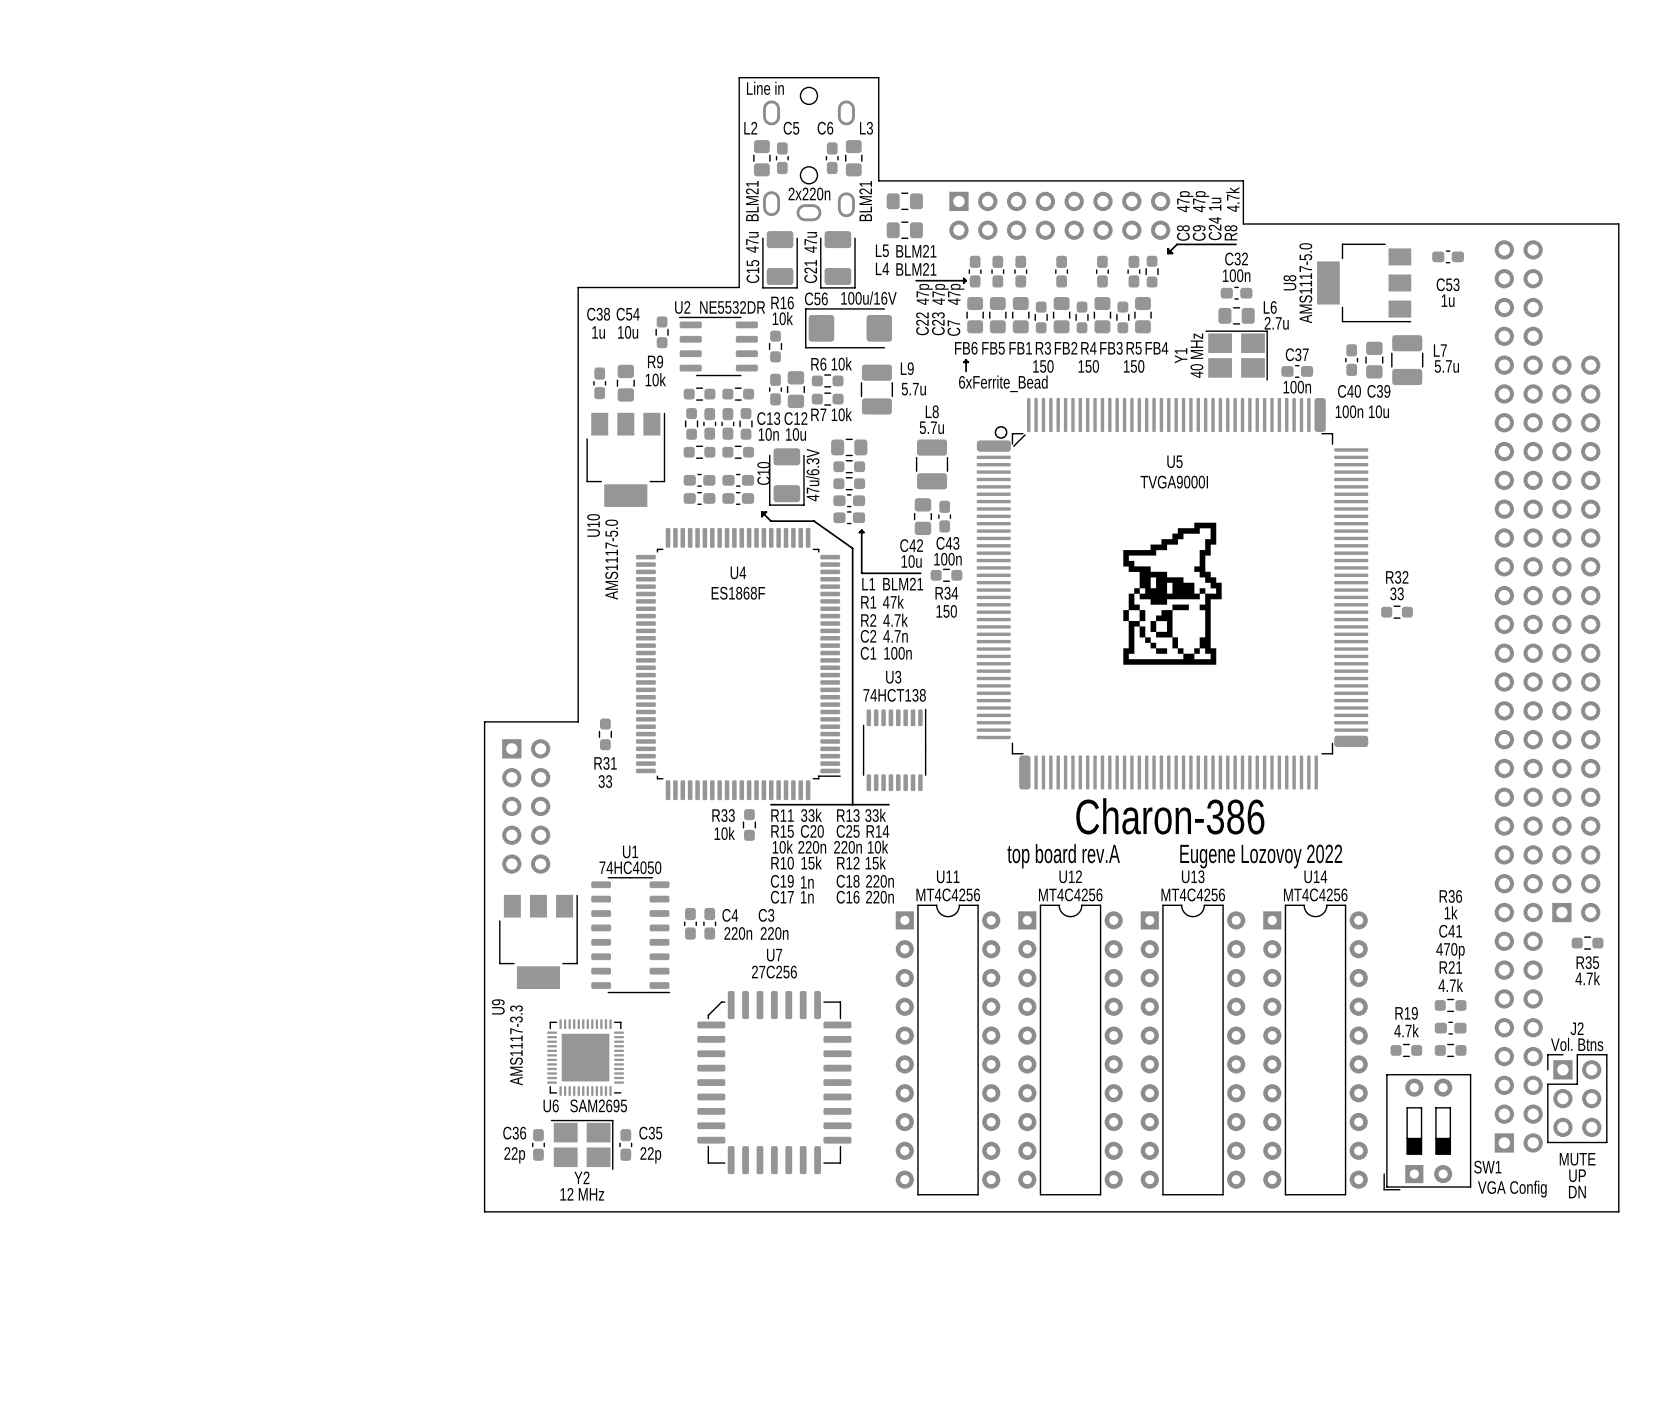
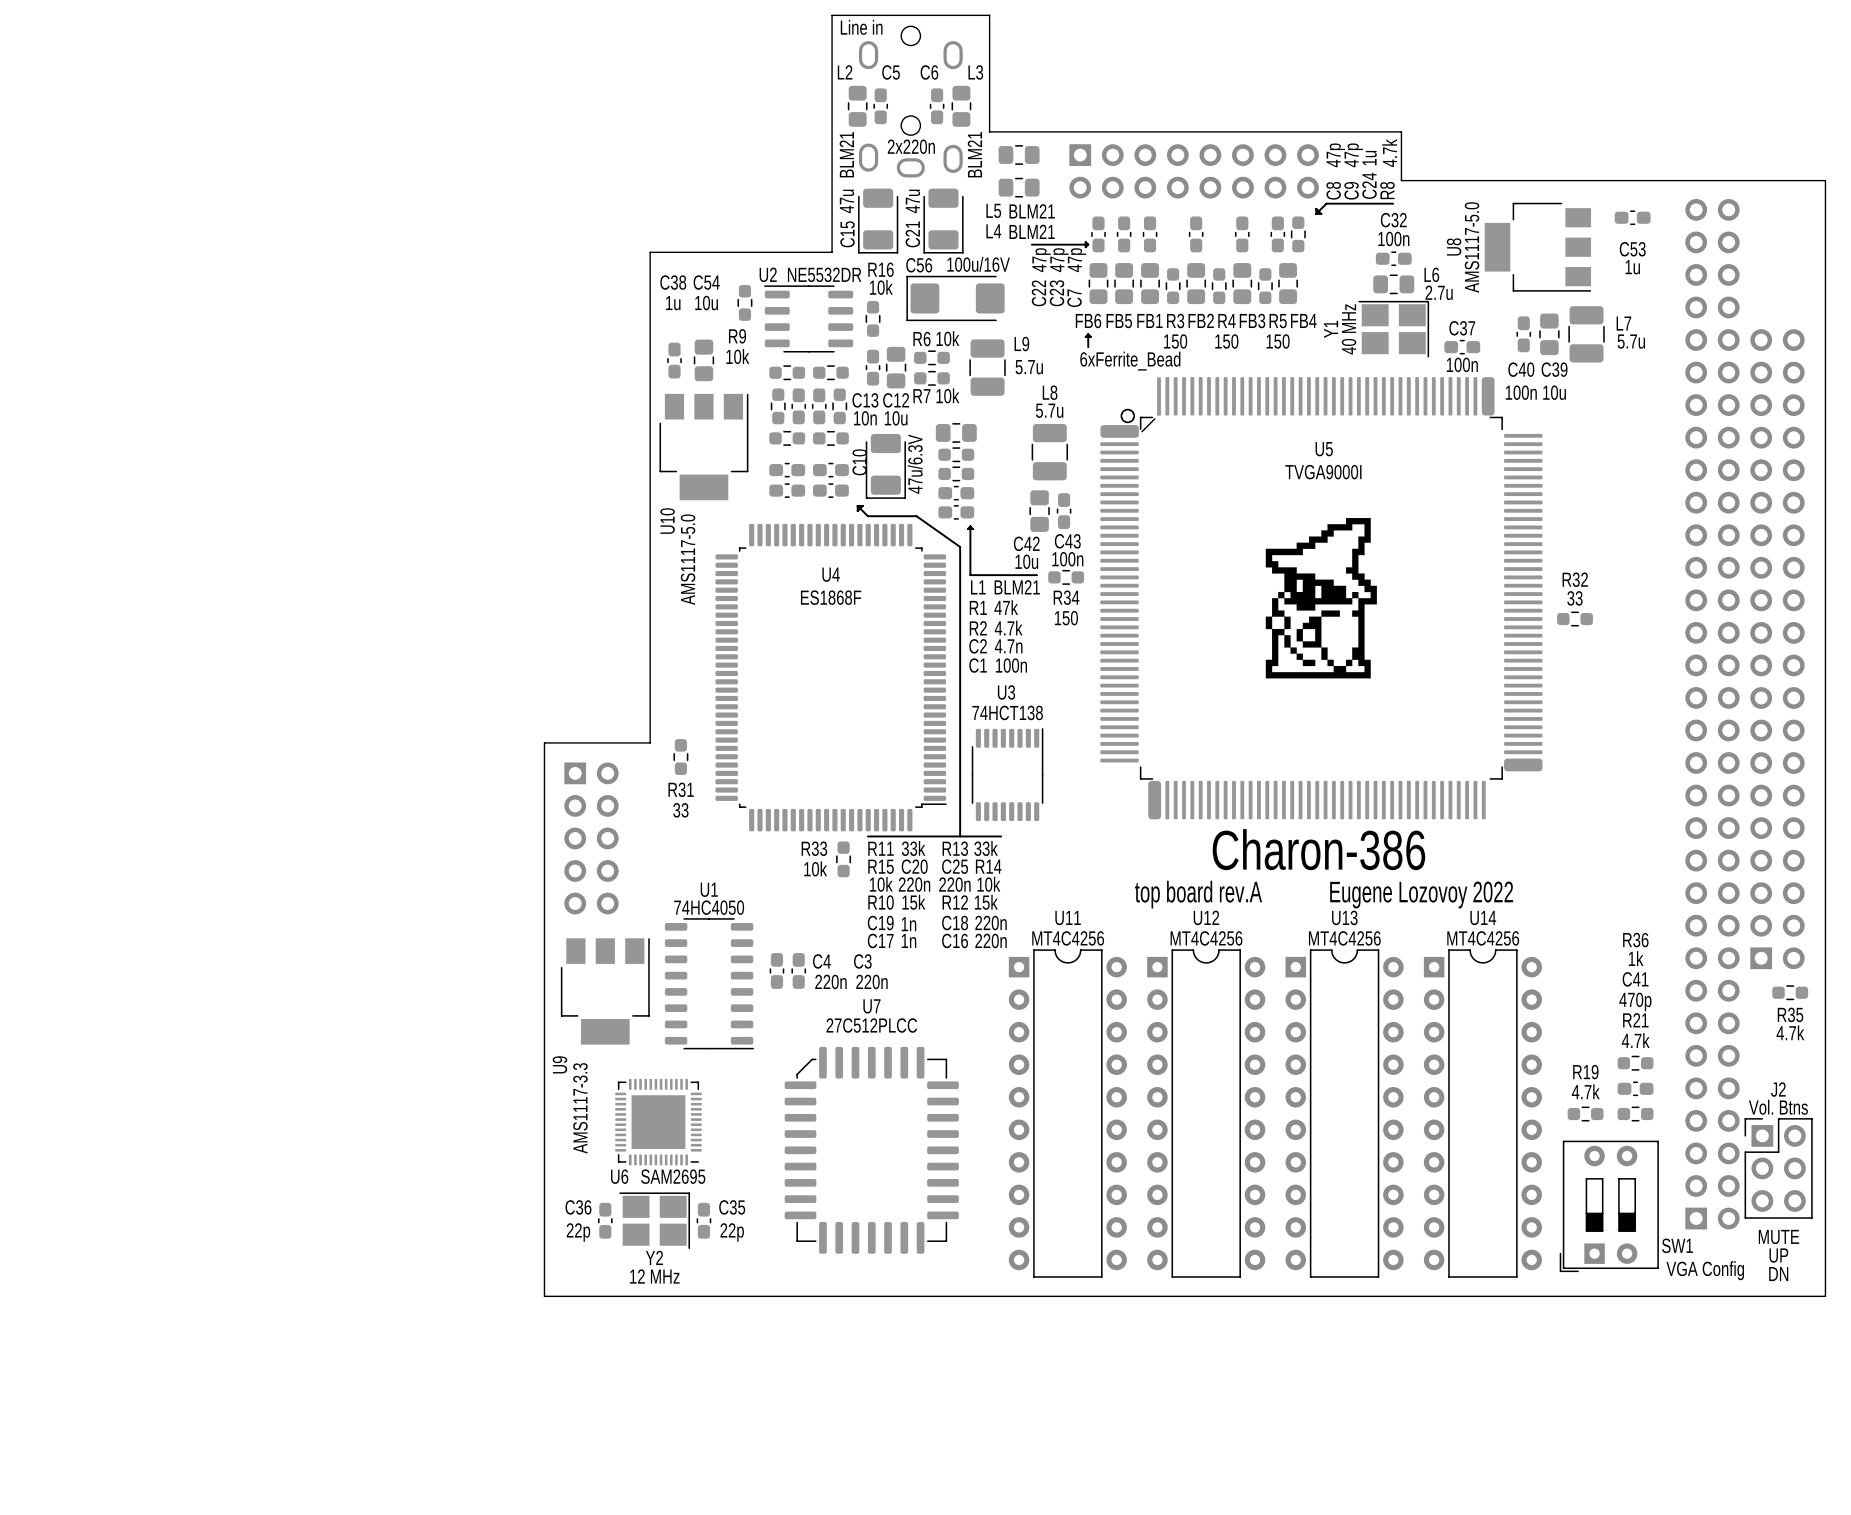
U7 value: 27C256 (774, 972) -> 27C512PLCC (871, 1025)

